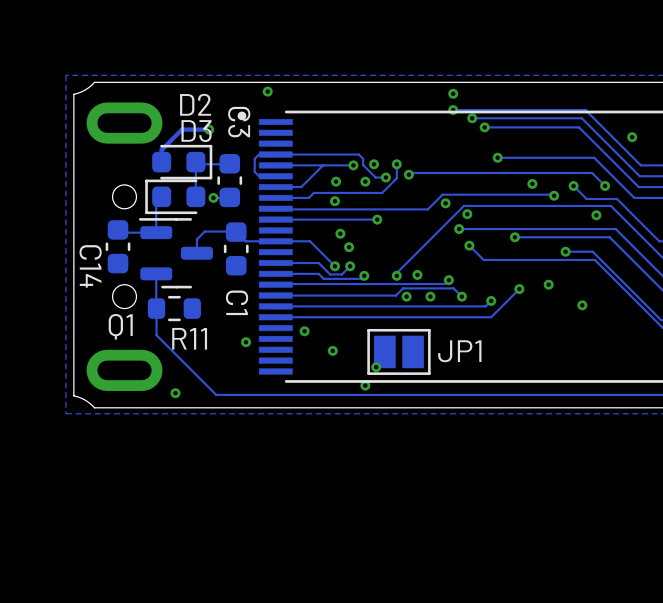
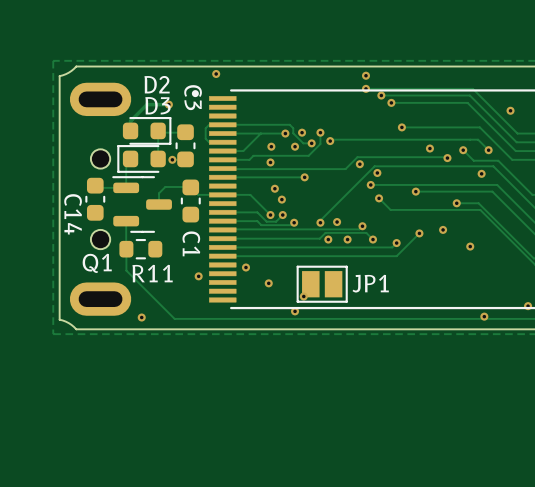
via: none -> (528, 306)
via: none -> (484, 316)

